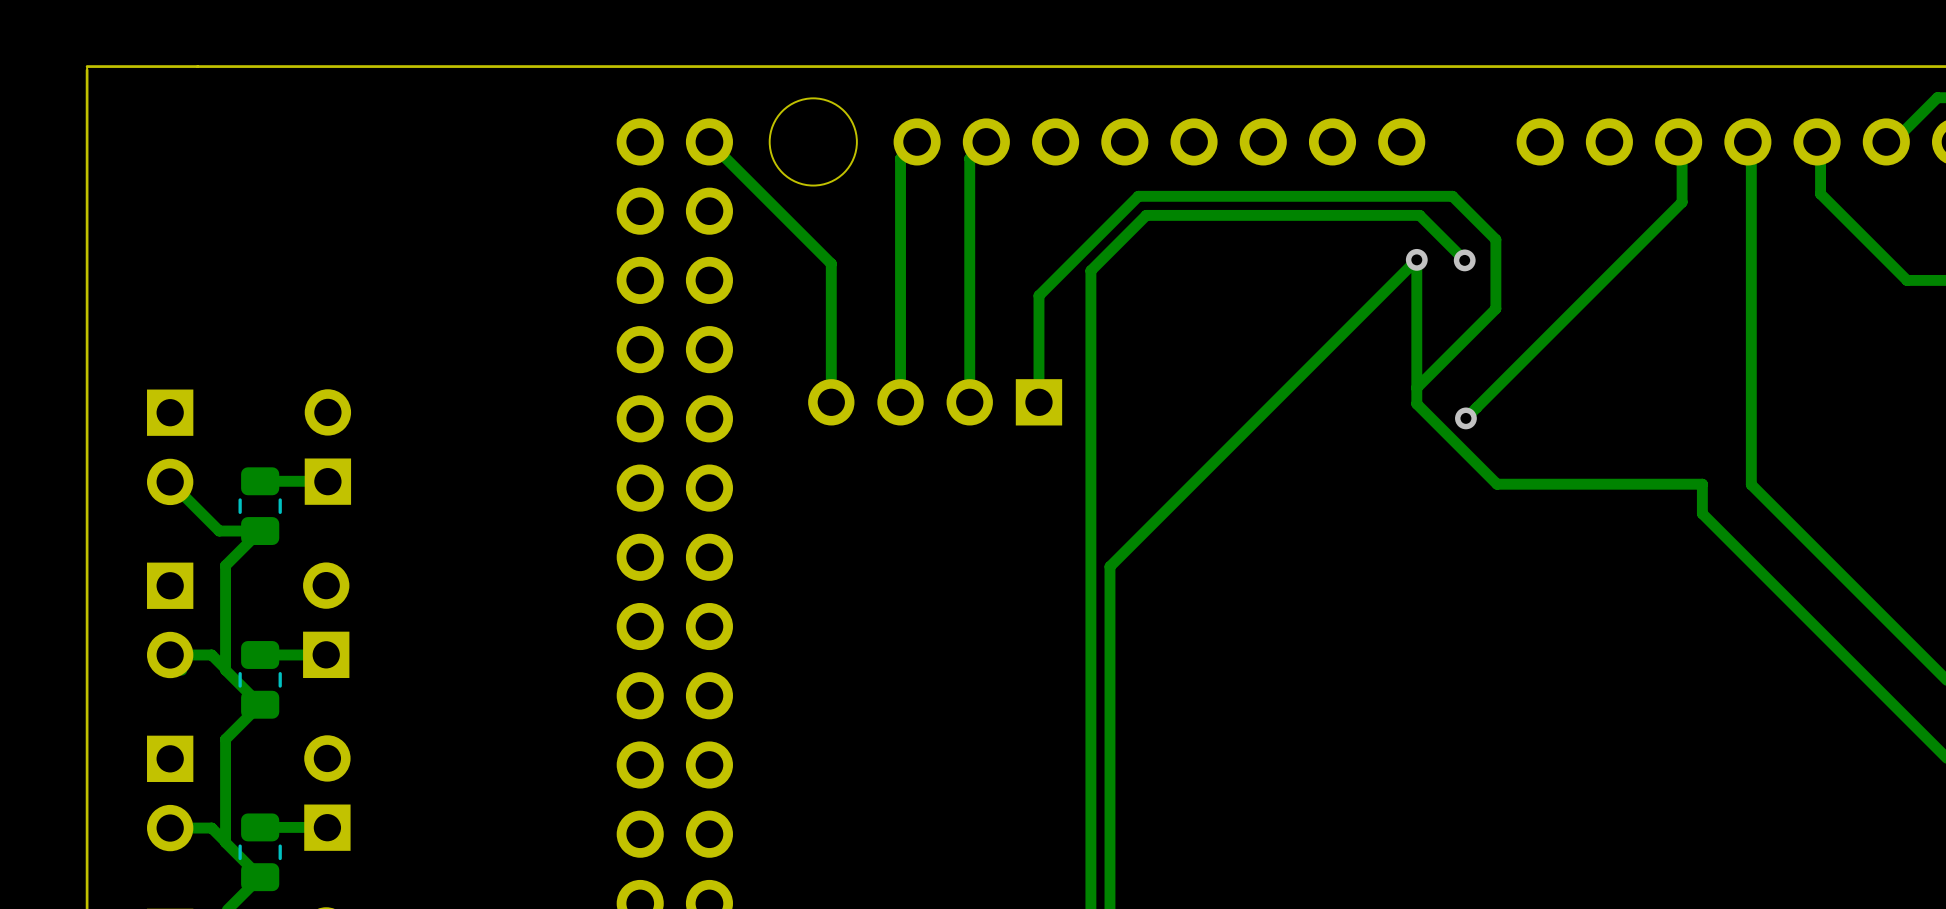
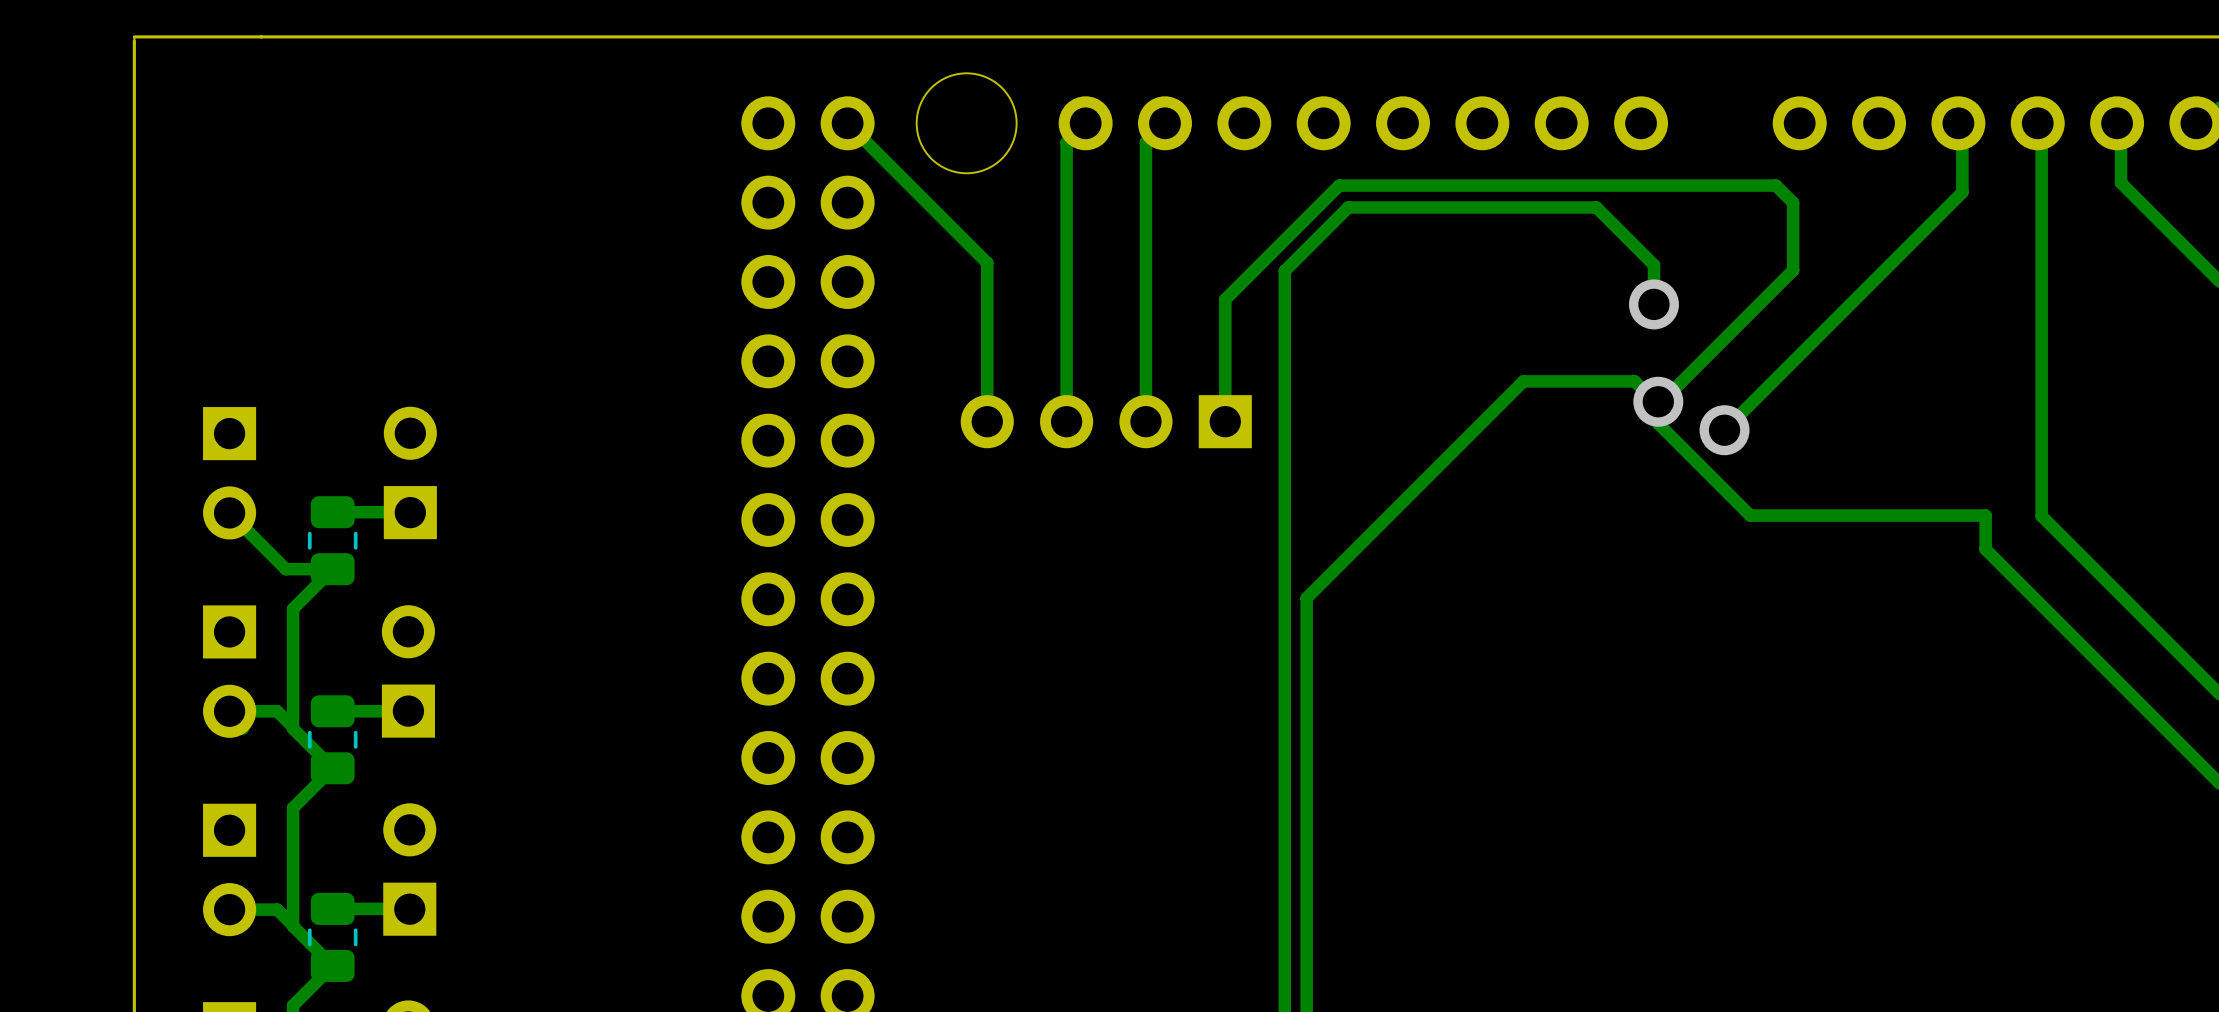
track: (1452, 196) (1495, 239) (1495, 308) -> (1699, 185) (1775, 185) (1793, 202) (1793, 270) (1748, 314)
track: (1362, 215) (1419, 215) (1464, 260) -> (1596, 207) (1653, 264) (1653, 304)
via: (1416, 259) -> none
via: (1464, 260) -> none
via: none -> (1653, 304)
via: none -> (1658, 401)
track: (1416, 387) (1416, 259) (1109, 566) -> (1658, 404) (1634, 381) (1523, 381) (1306, 598) (1306, 610)
via size: [1455, 407, 1477, 430] -> [1699, 405, 1750, 456]

